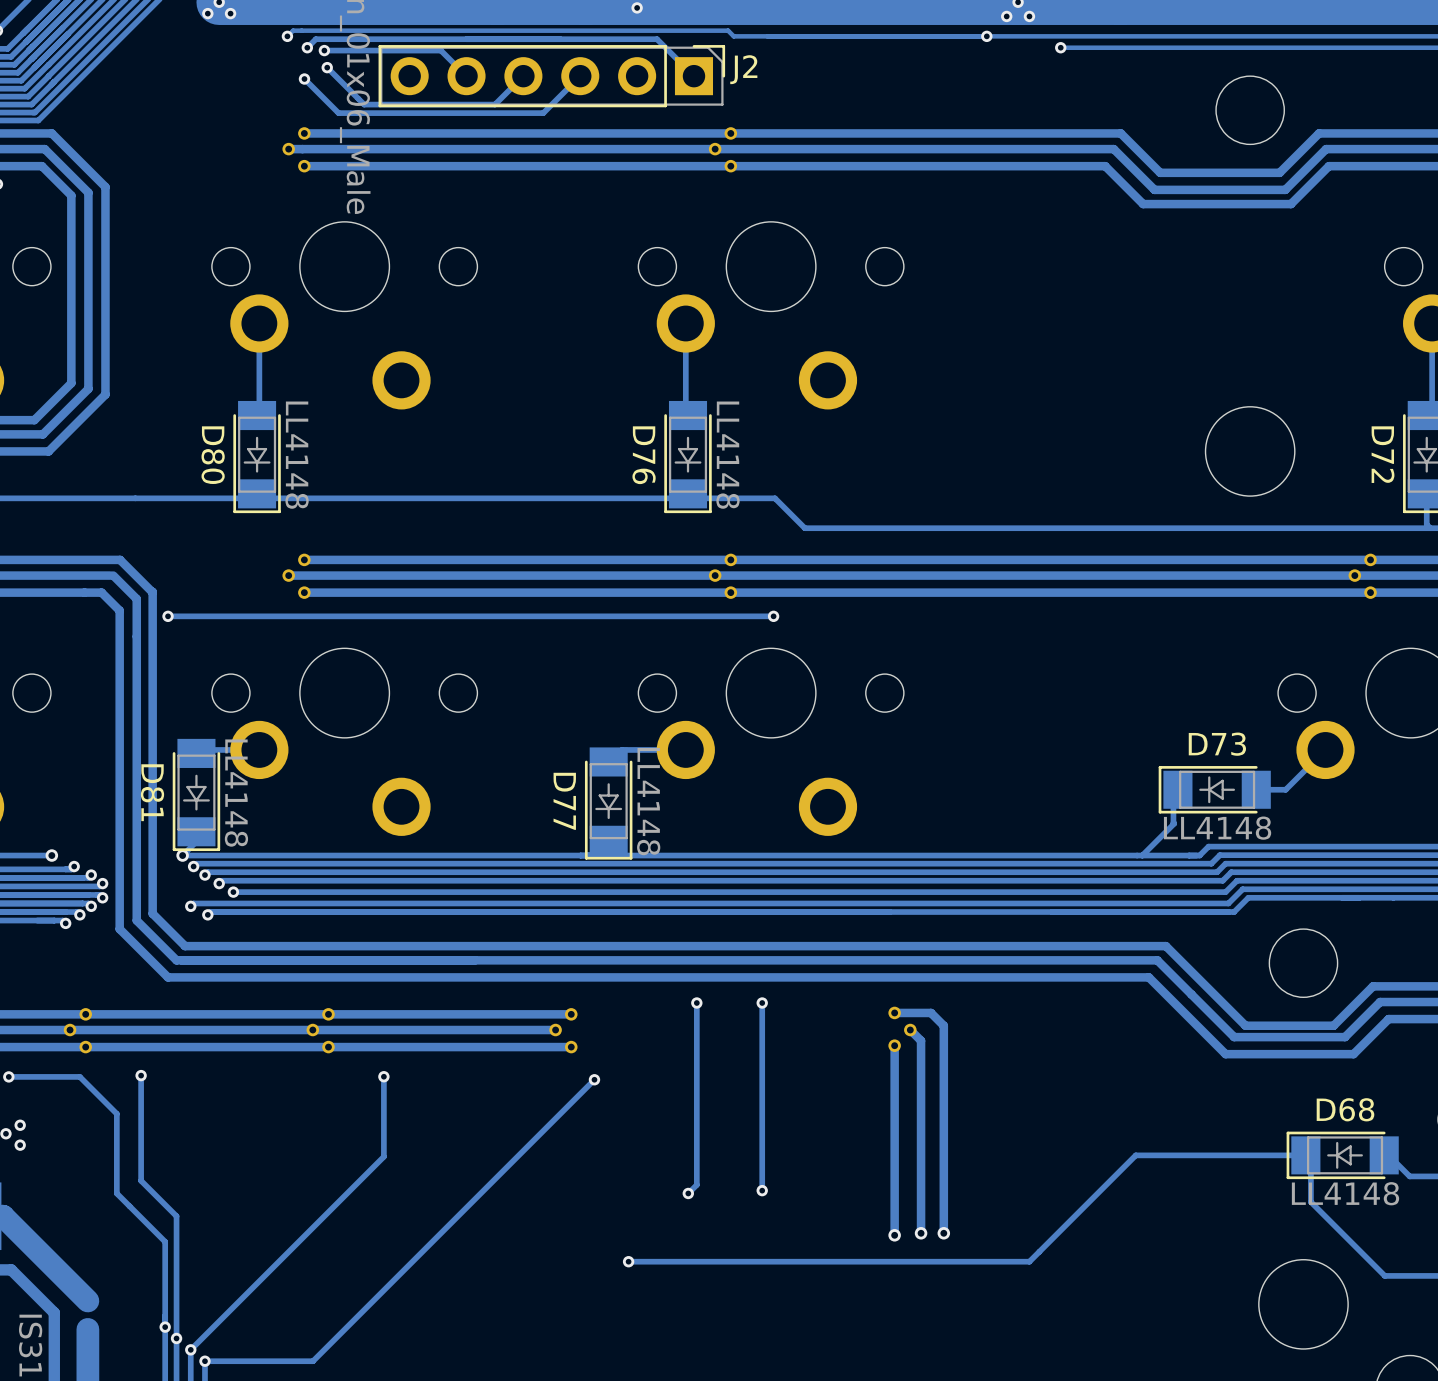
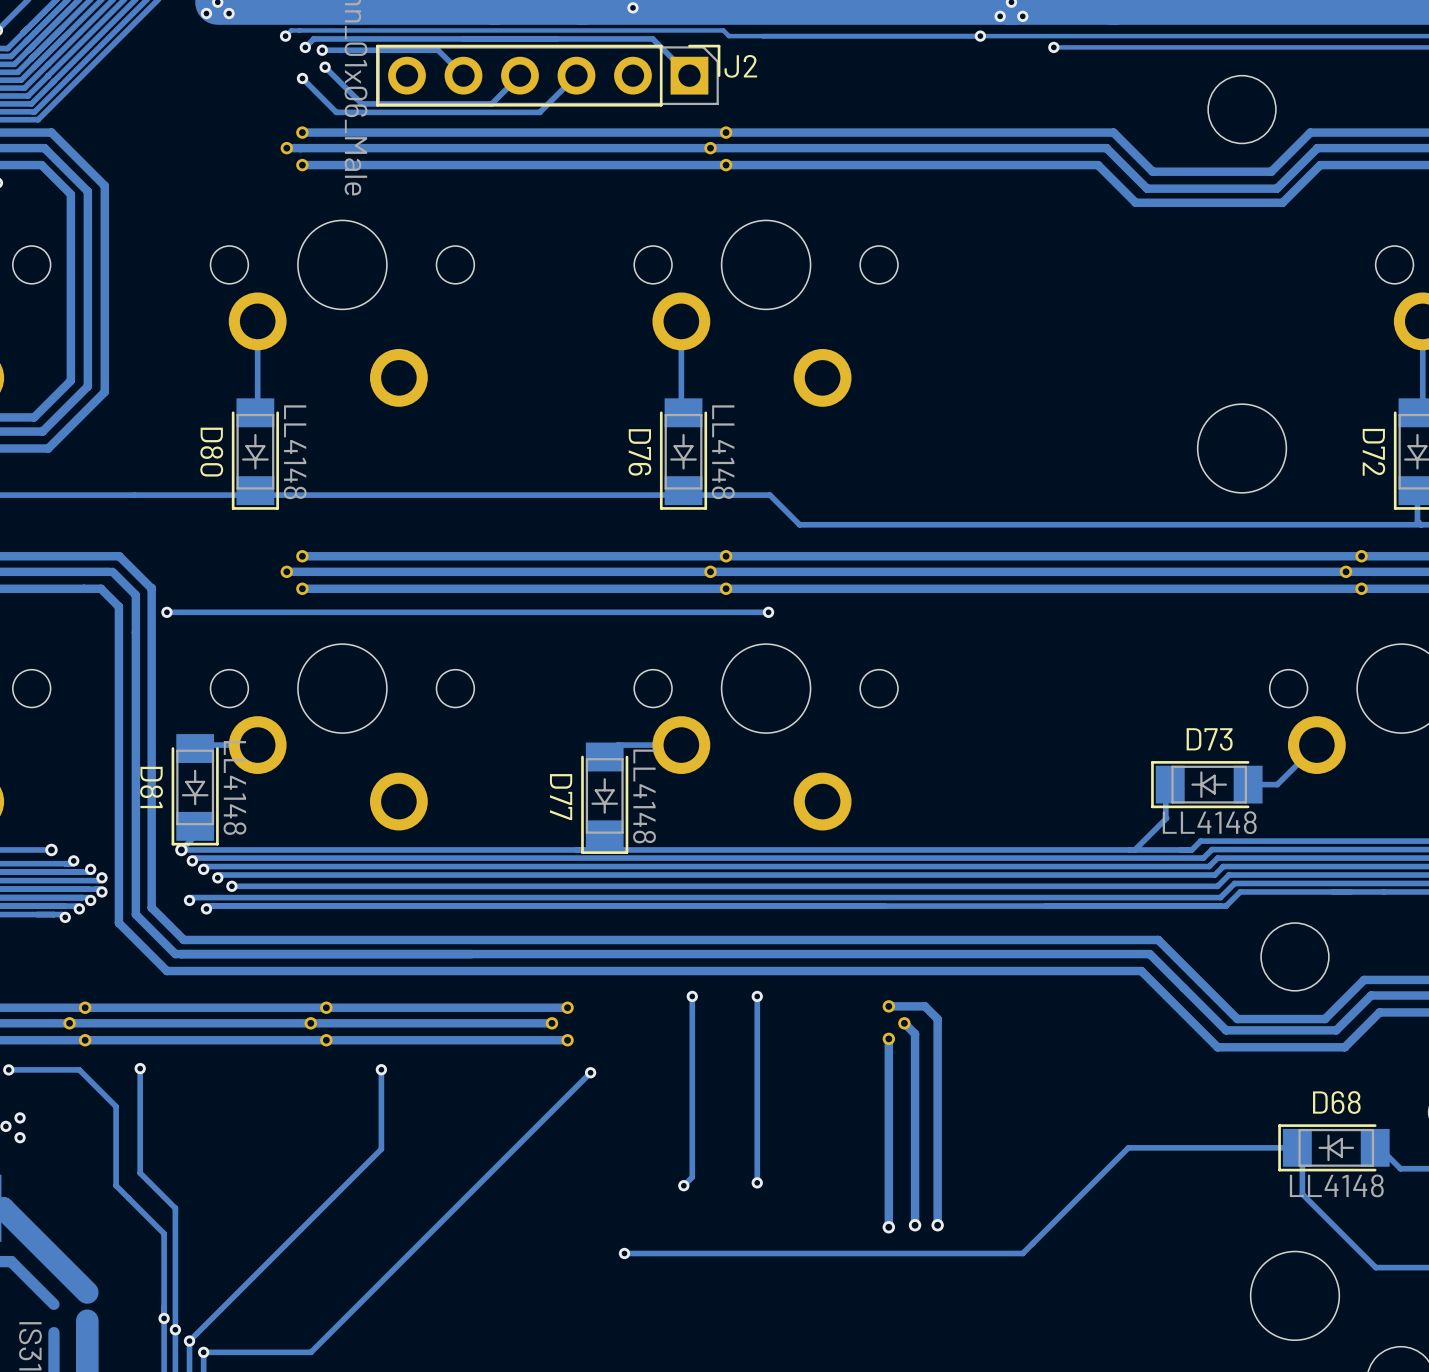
track: (54, 1312) (54, 1341) -> none

